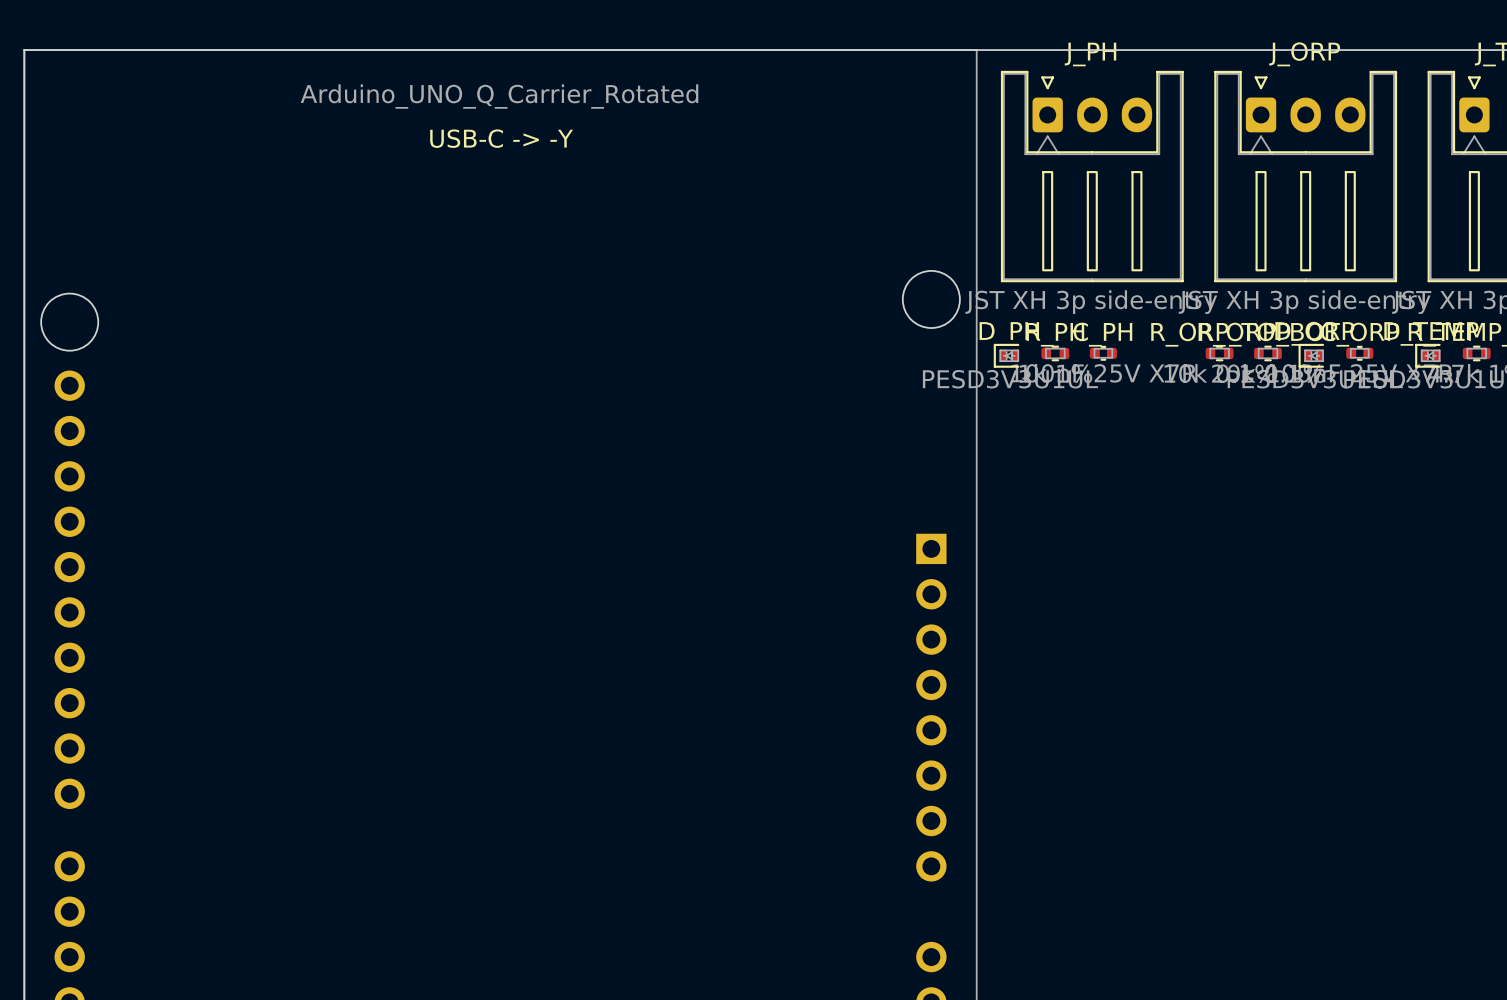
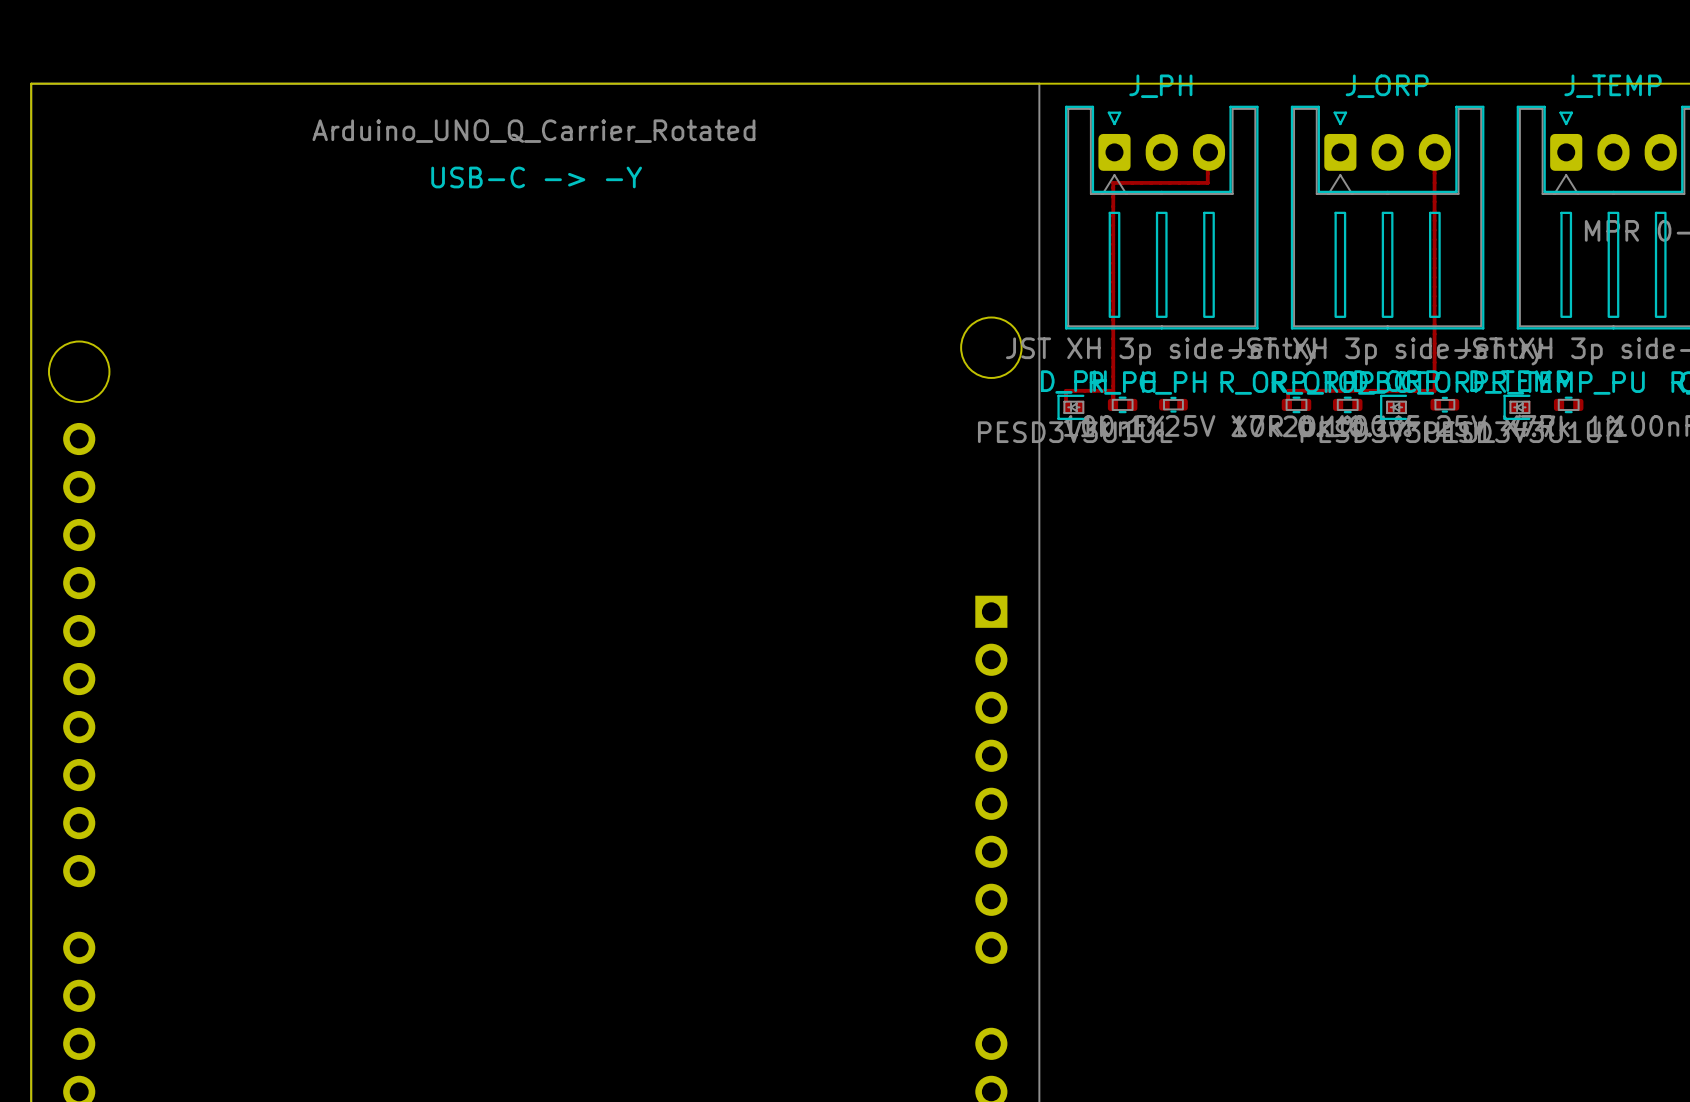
top track: none -> (1209, 152) (1207, 182) (1113, 182) (1113, 405)
top track: none -> (1434, 152) (1434, 390) (1288, 390) (1286, 404)
top track: none -> (1113, 390) (1066, 390) (1067, 407)

